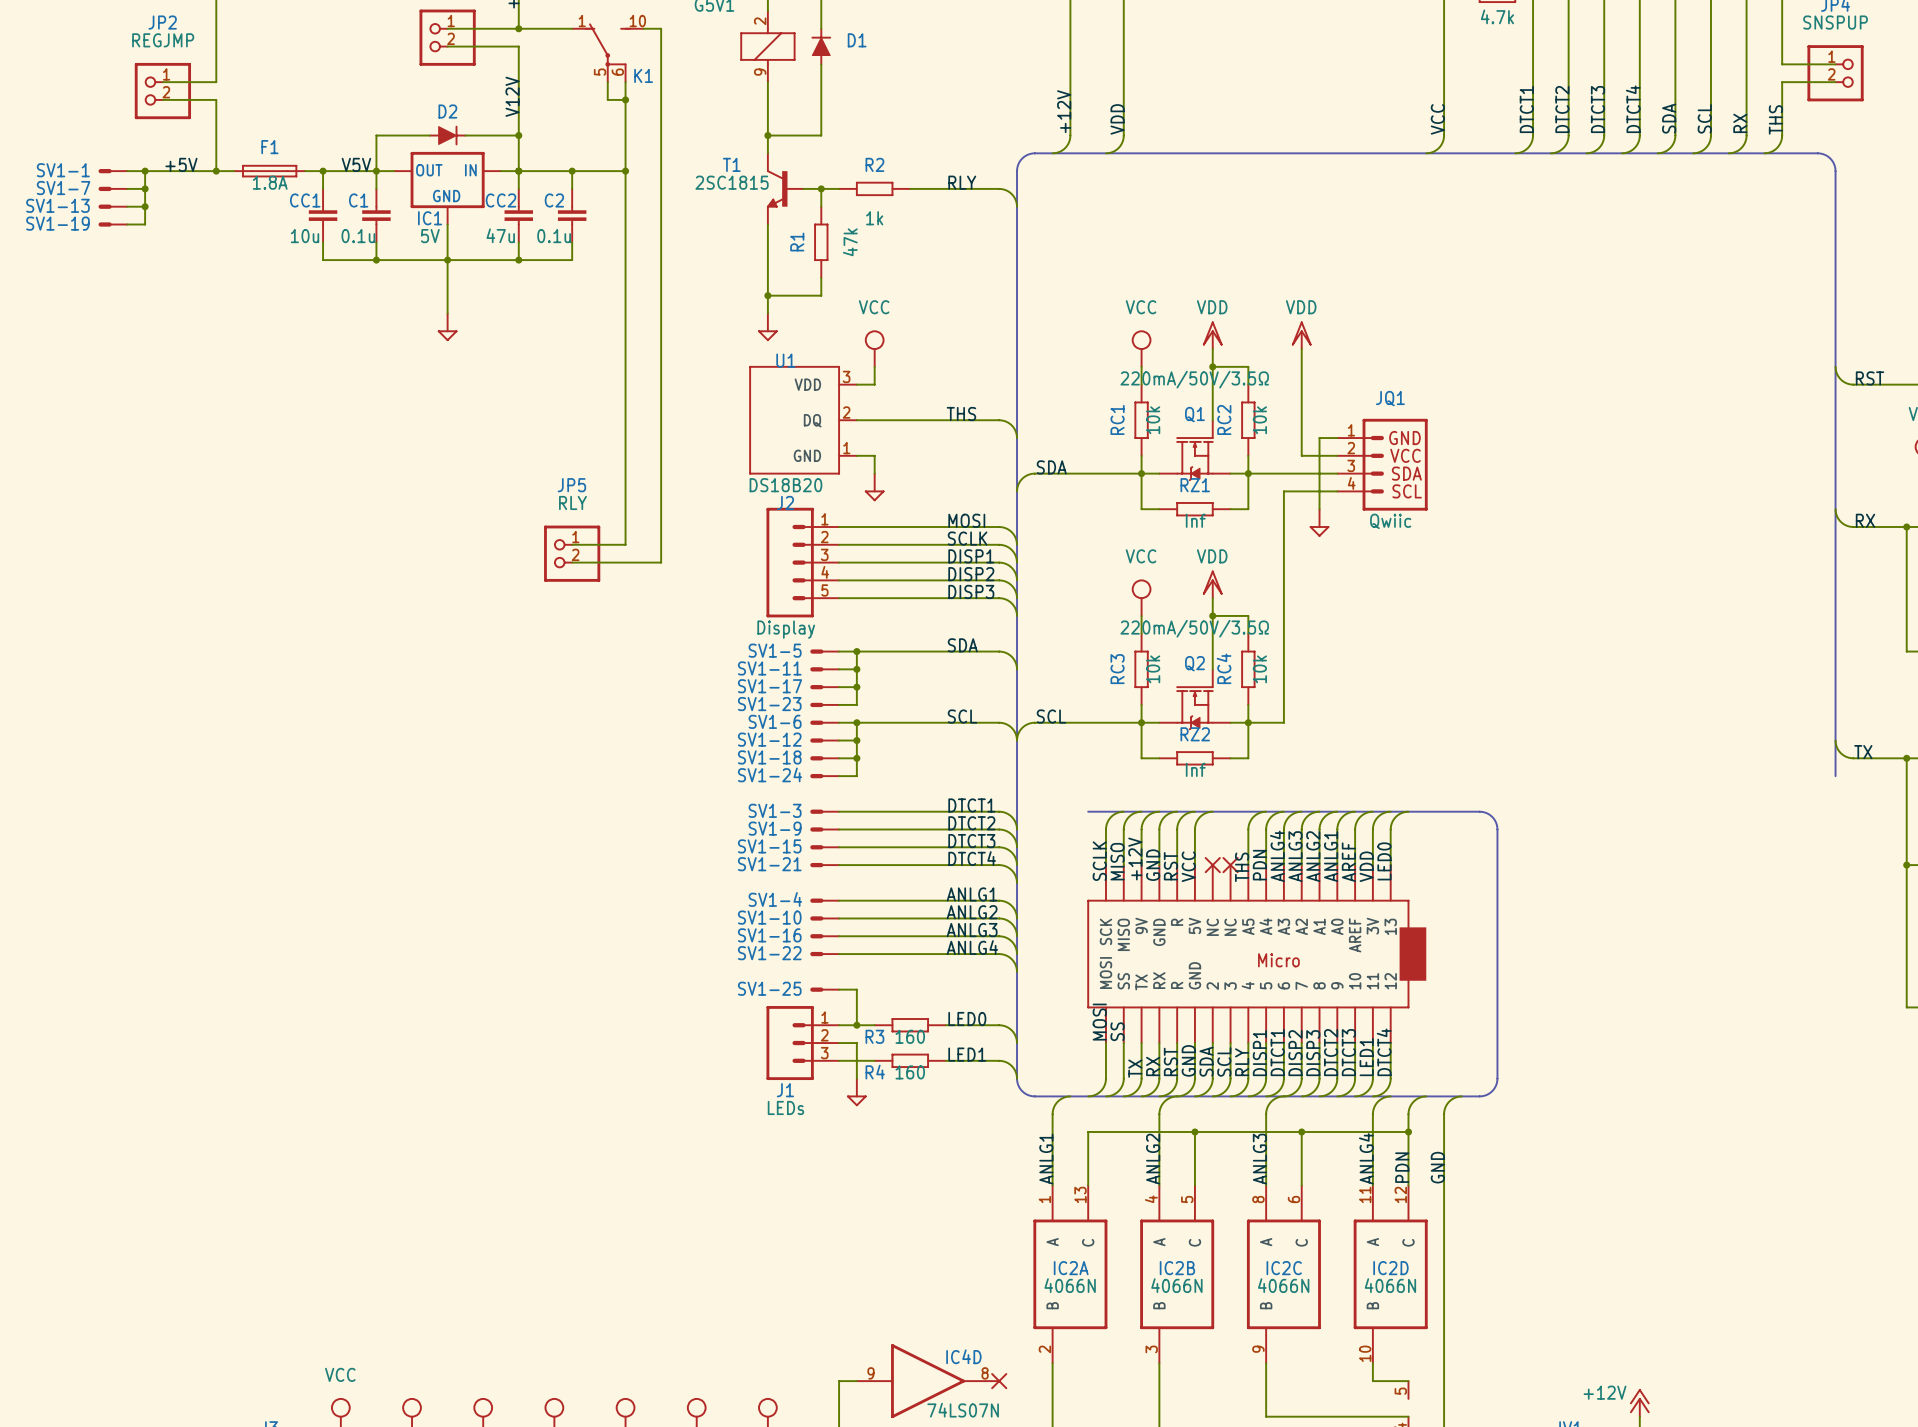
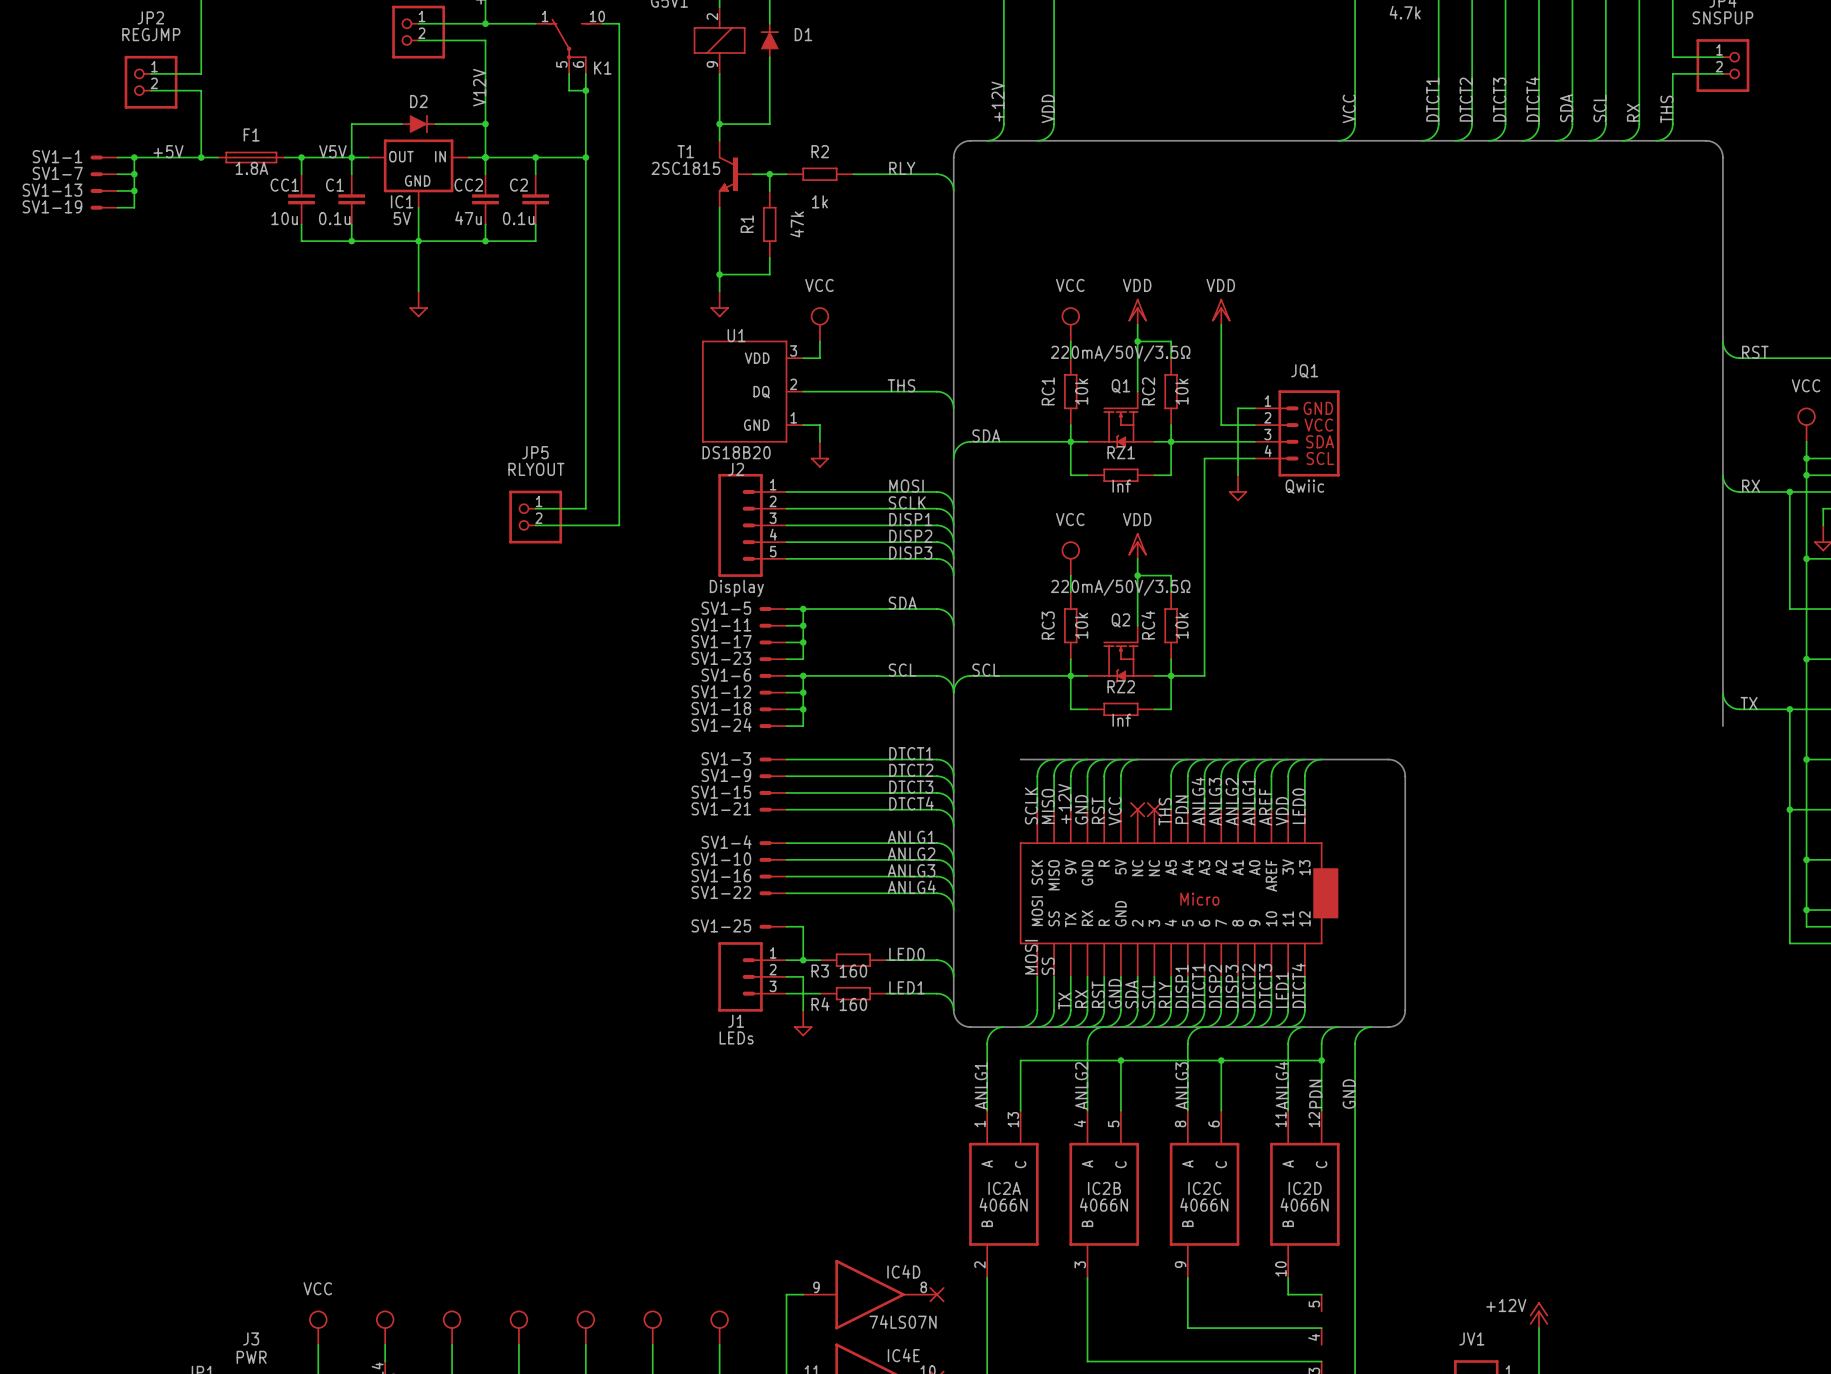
JP5 value: RLY (572, 502) -> RLYOUT (536, 469)

